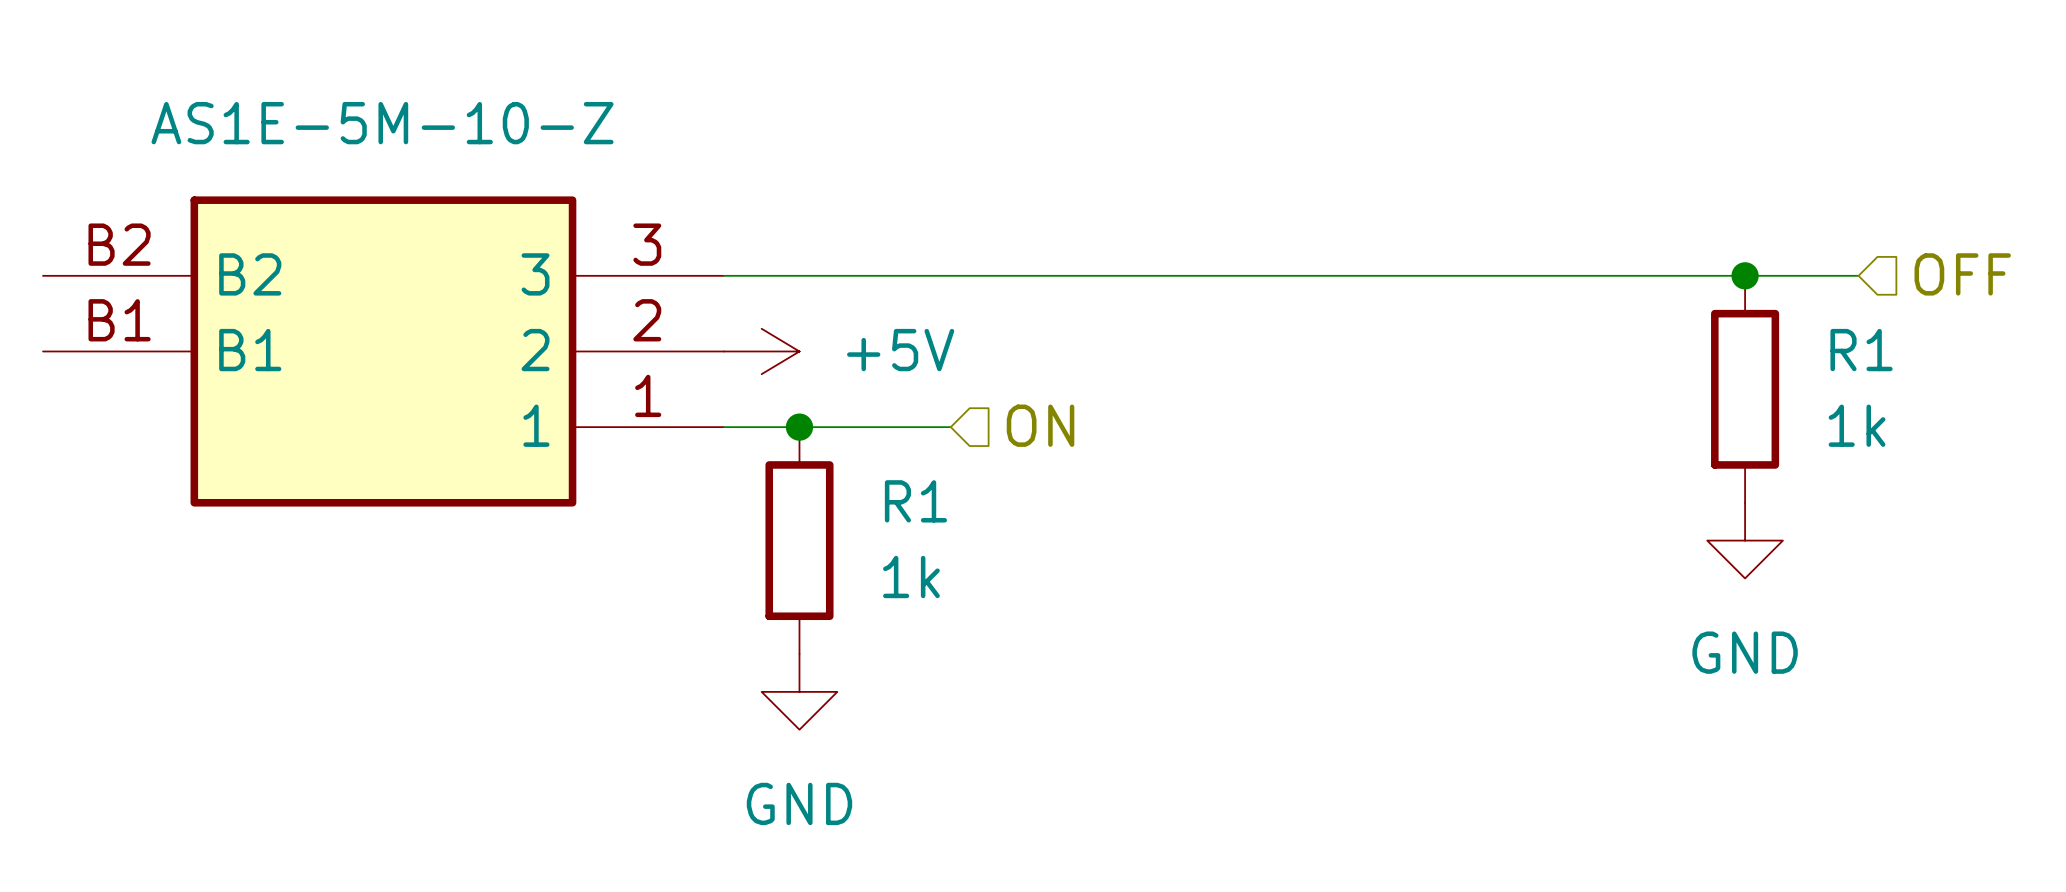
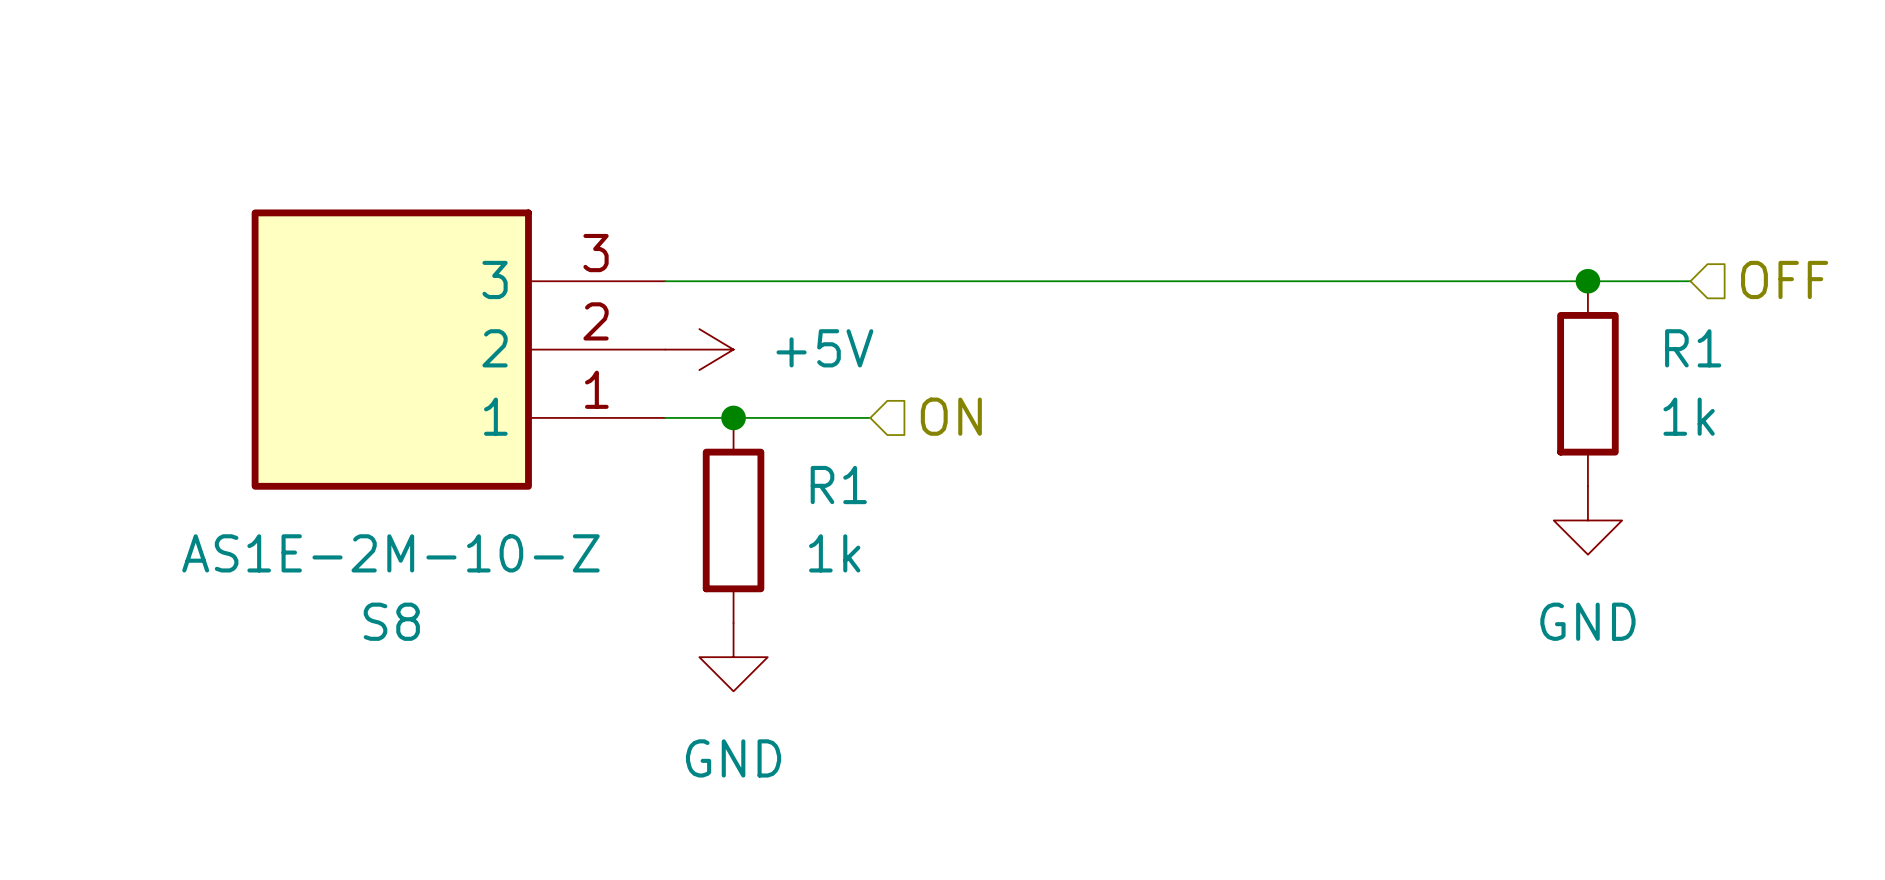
part: AS1E-5M-10-Z (383, 351) -> none
S8: none -> AS1E-2M-10-Z (458, 349)

